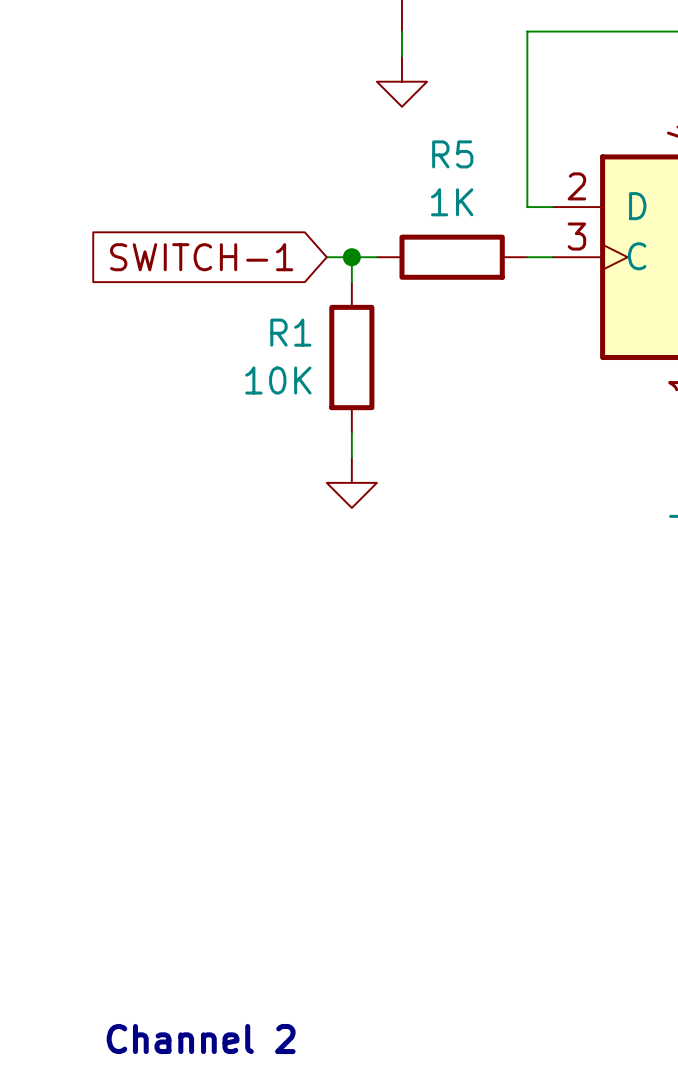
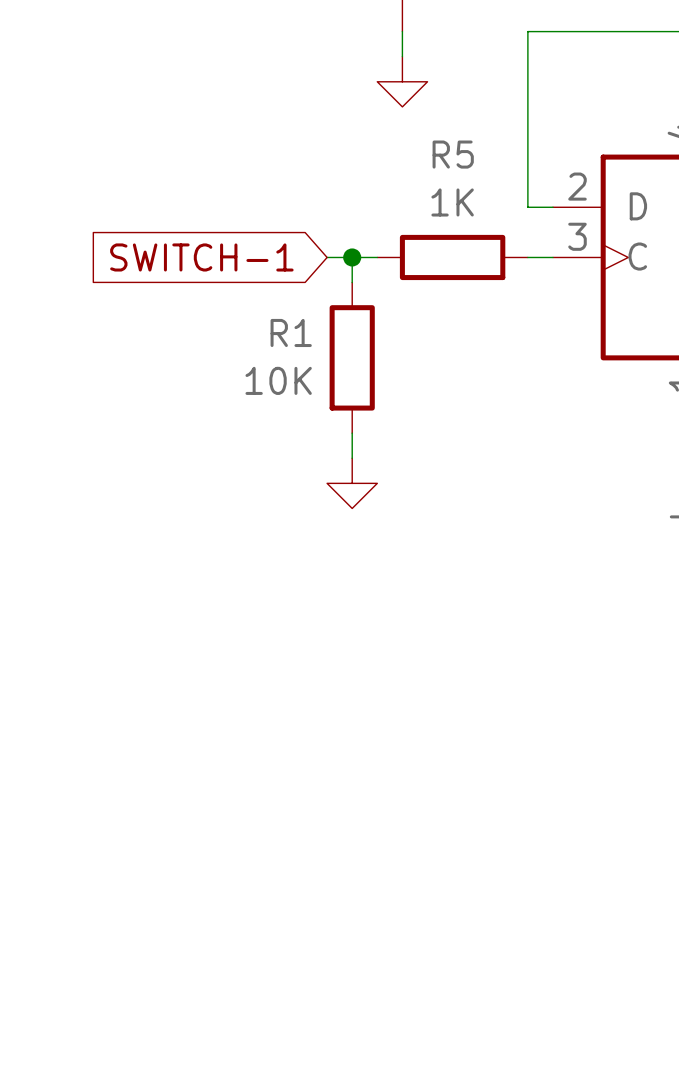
text: Channel 2 (201, 1039) -> none

